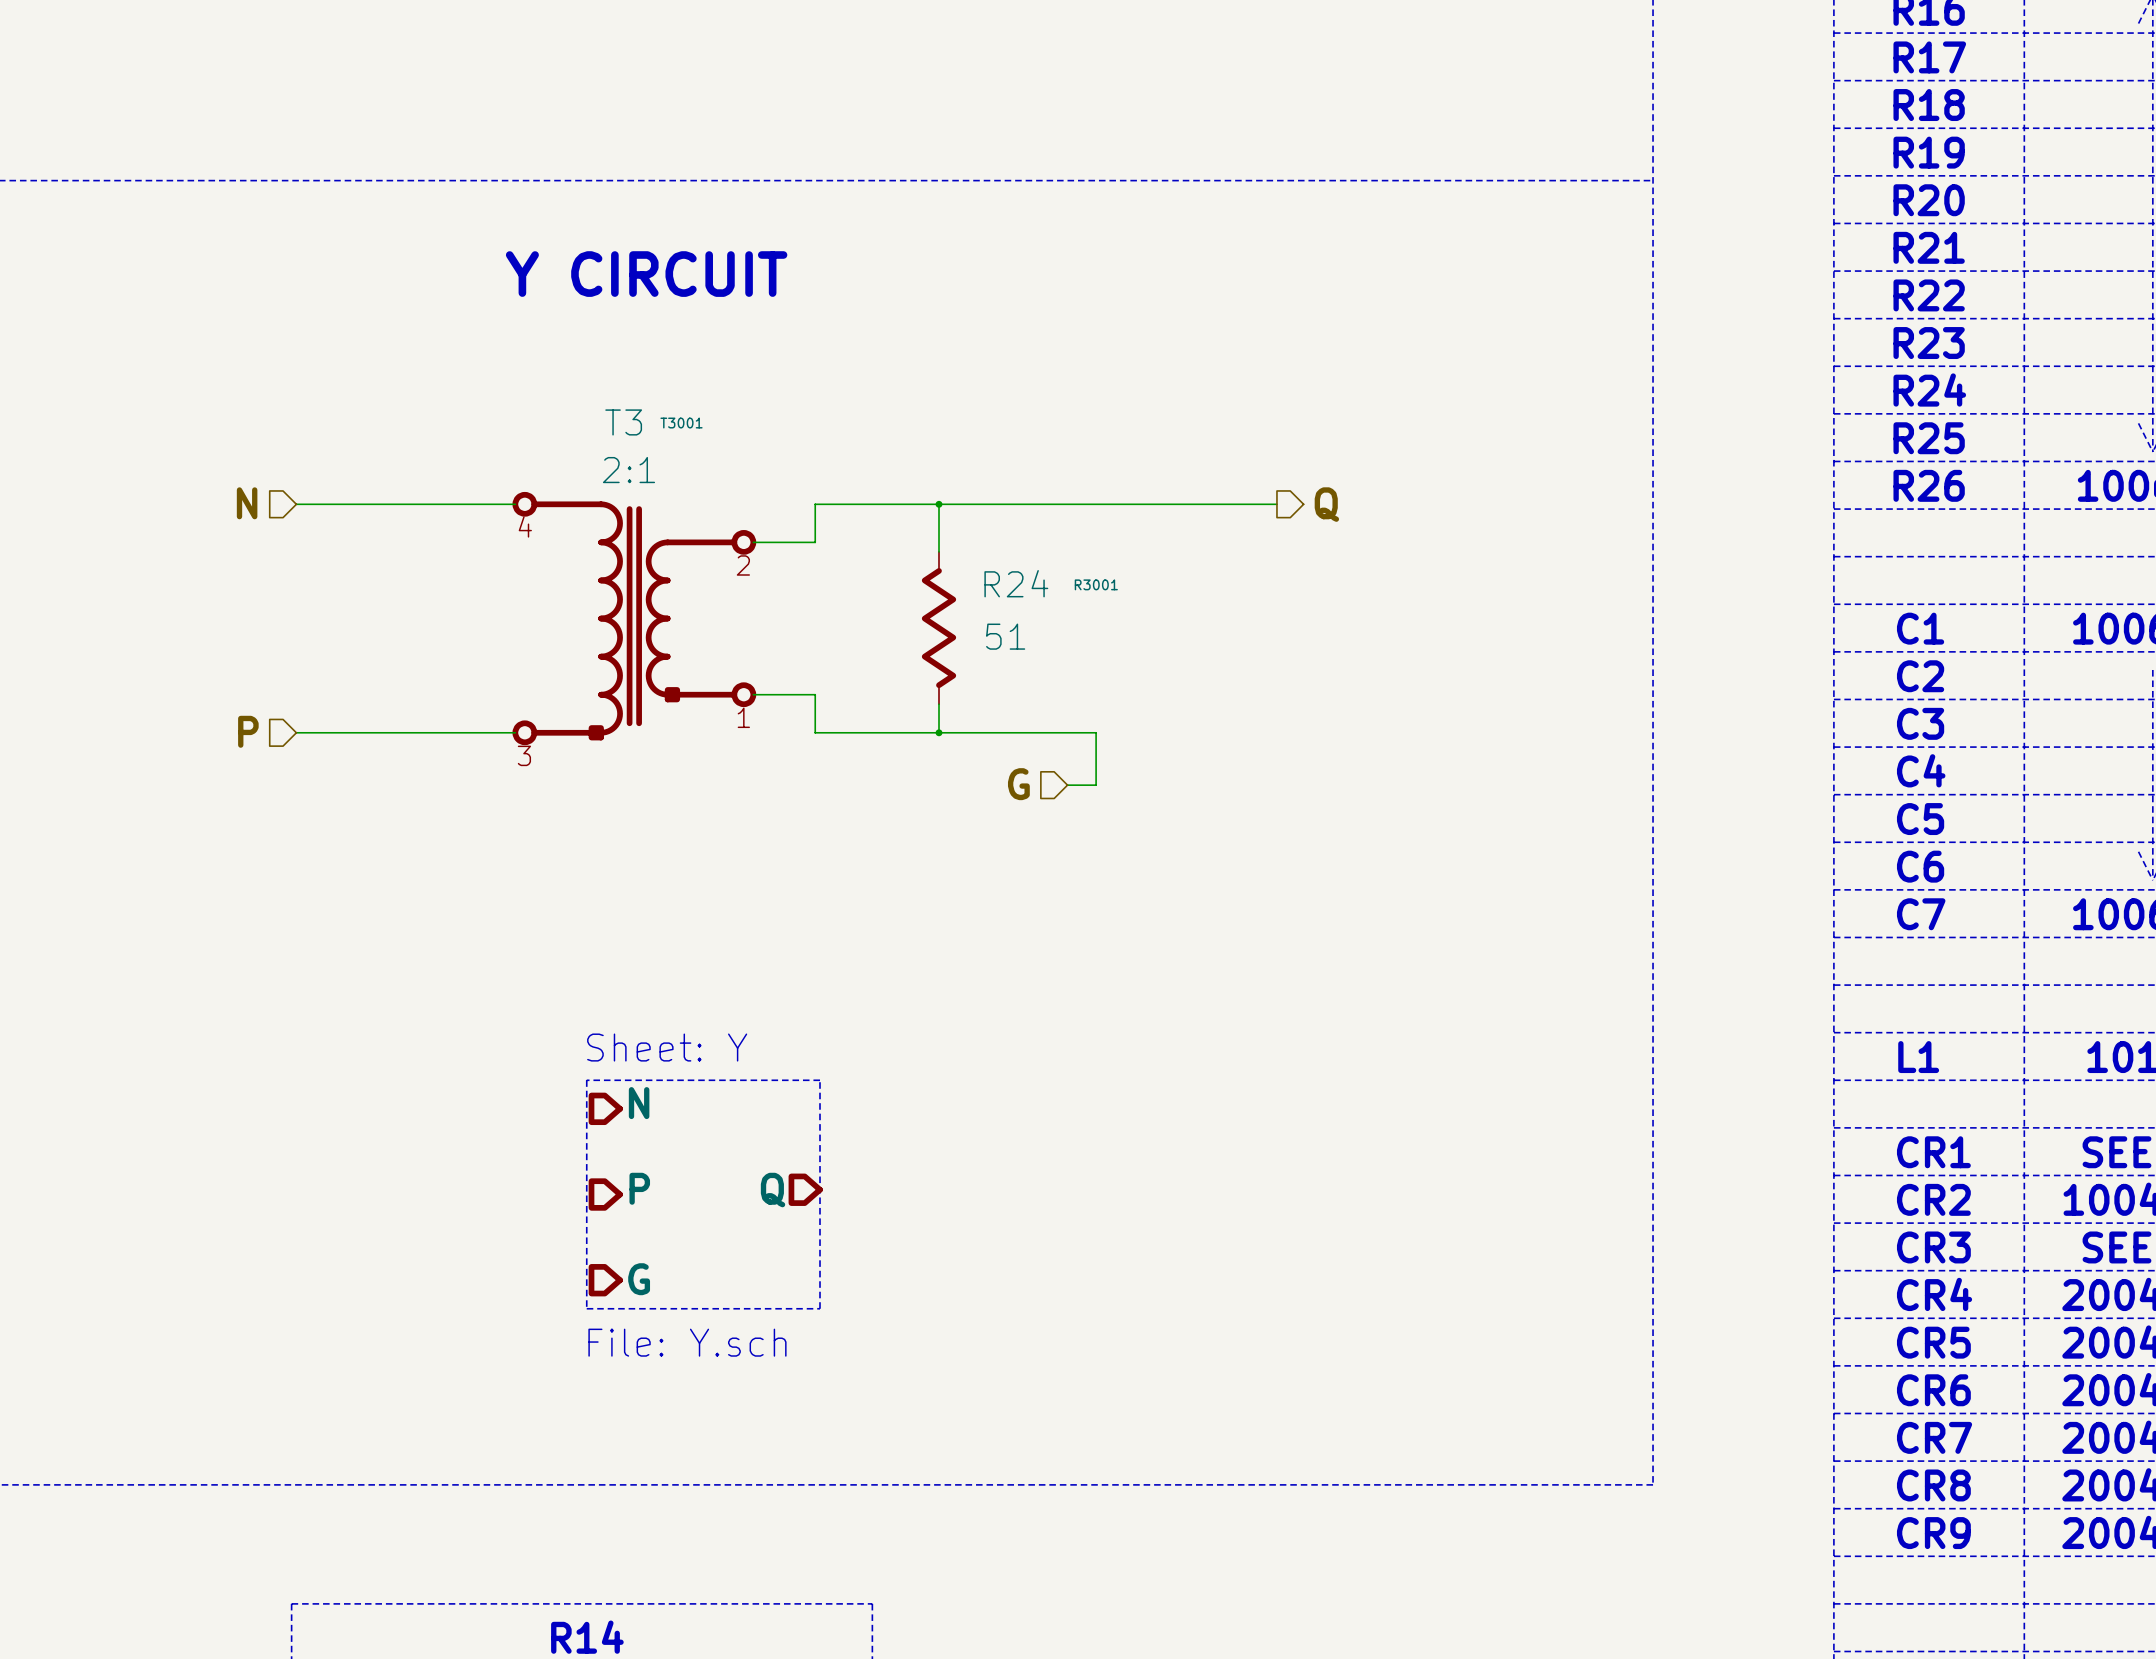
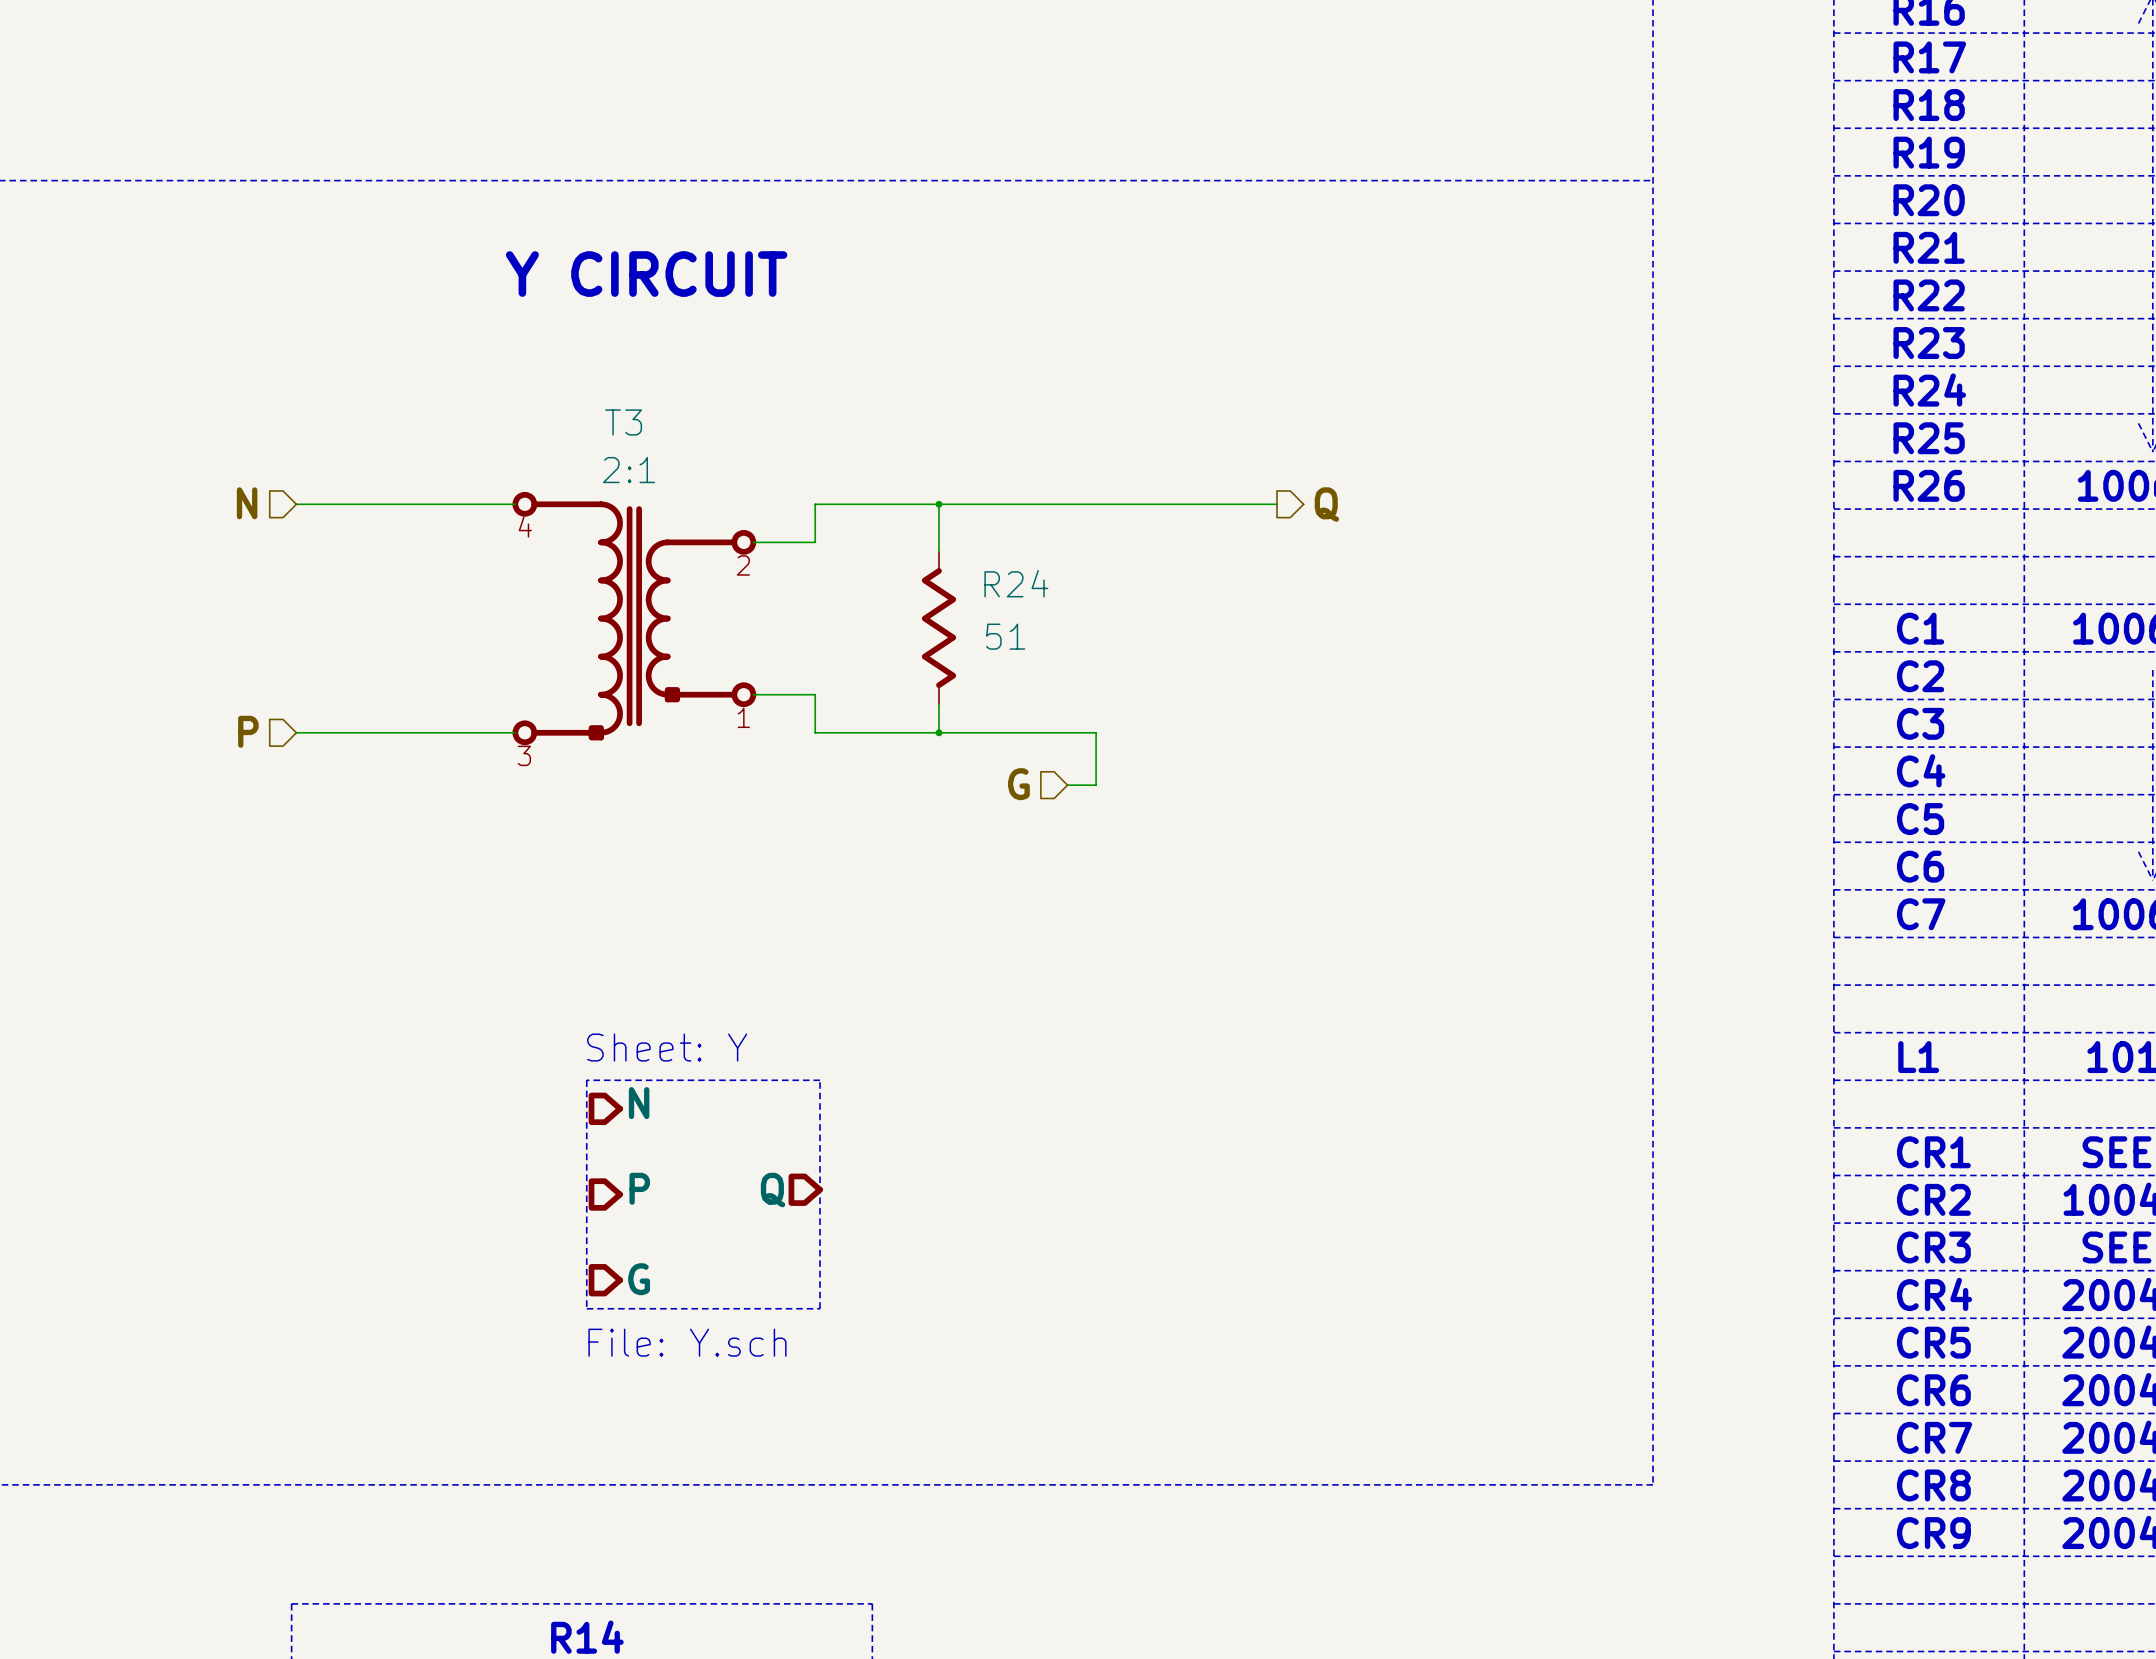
T3001 name: T3001 (681, 423) -> none
R3001 name: R3001 (1096, 584) -> none

